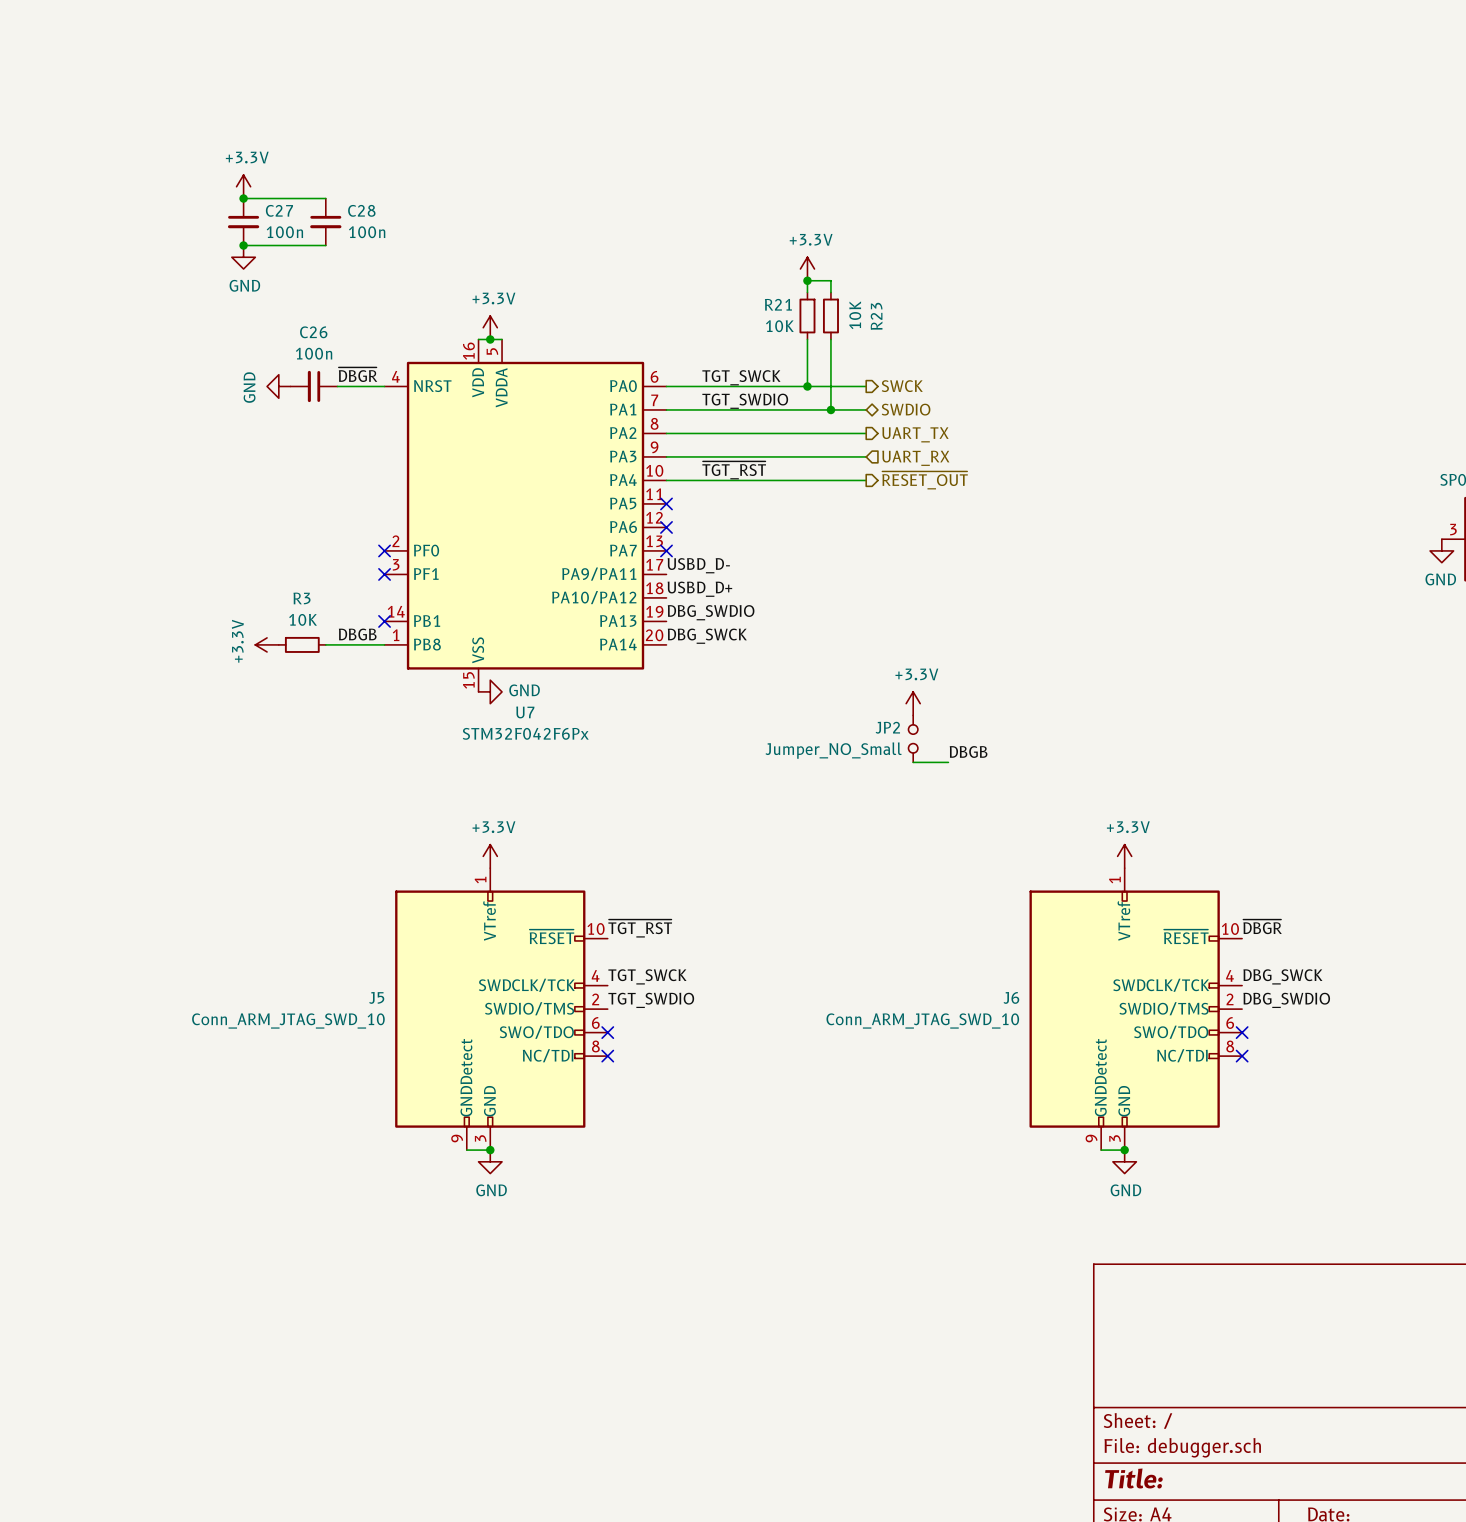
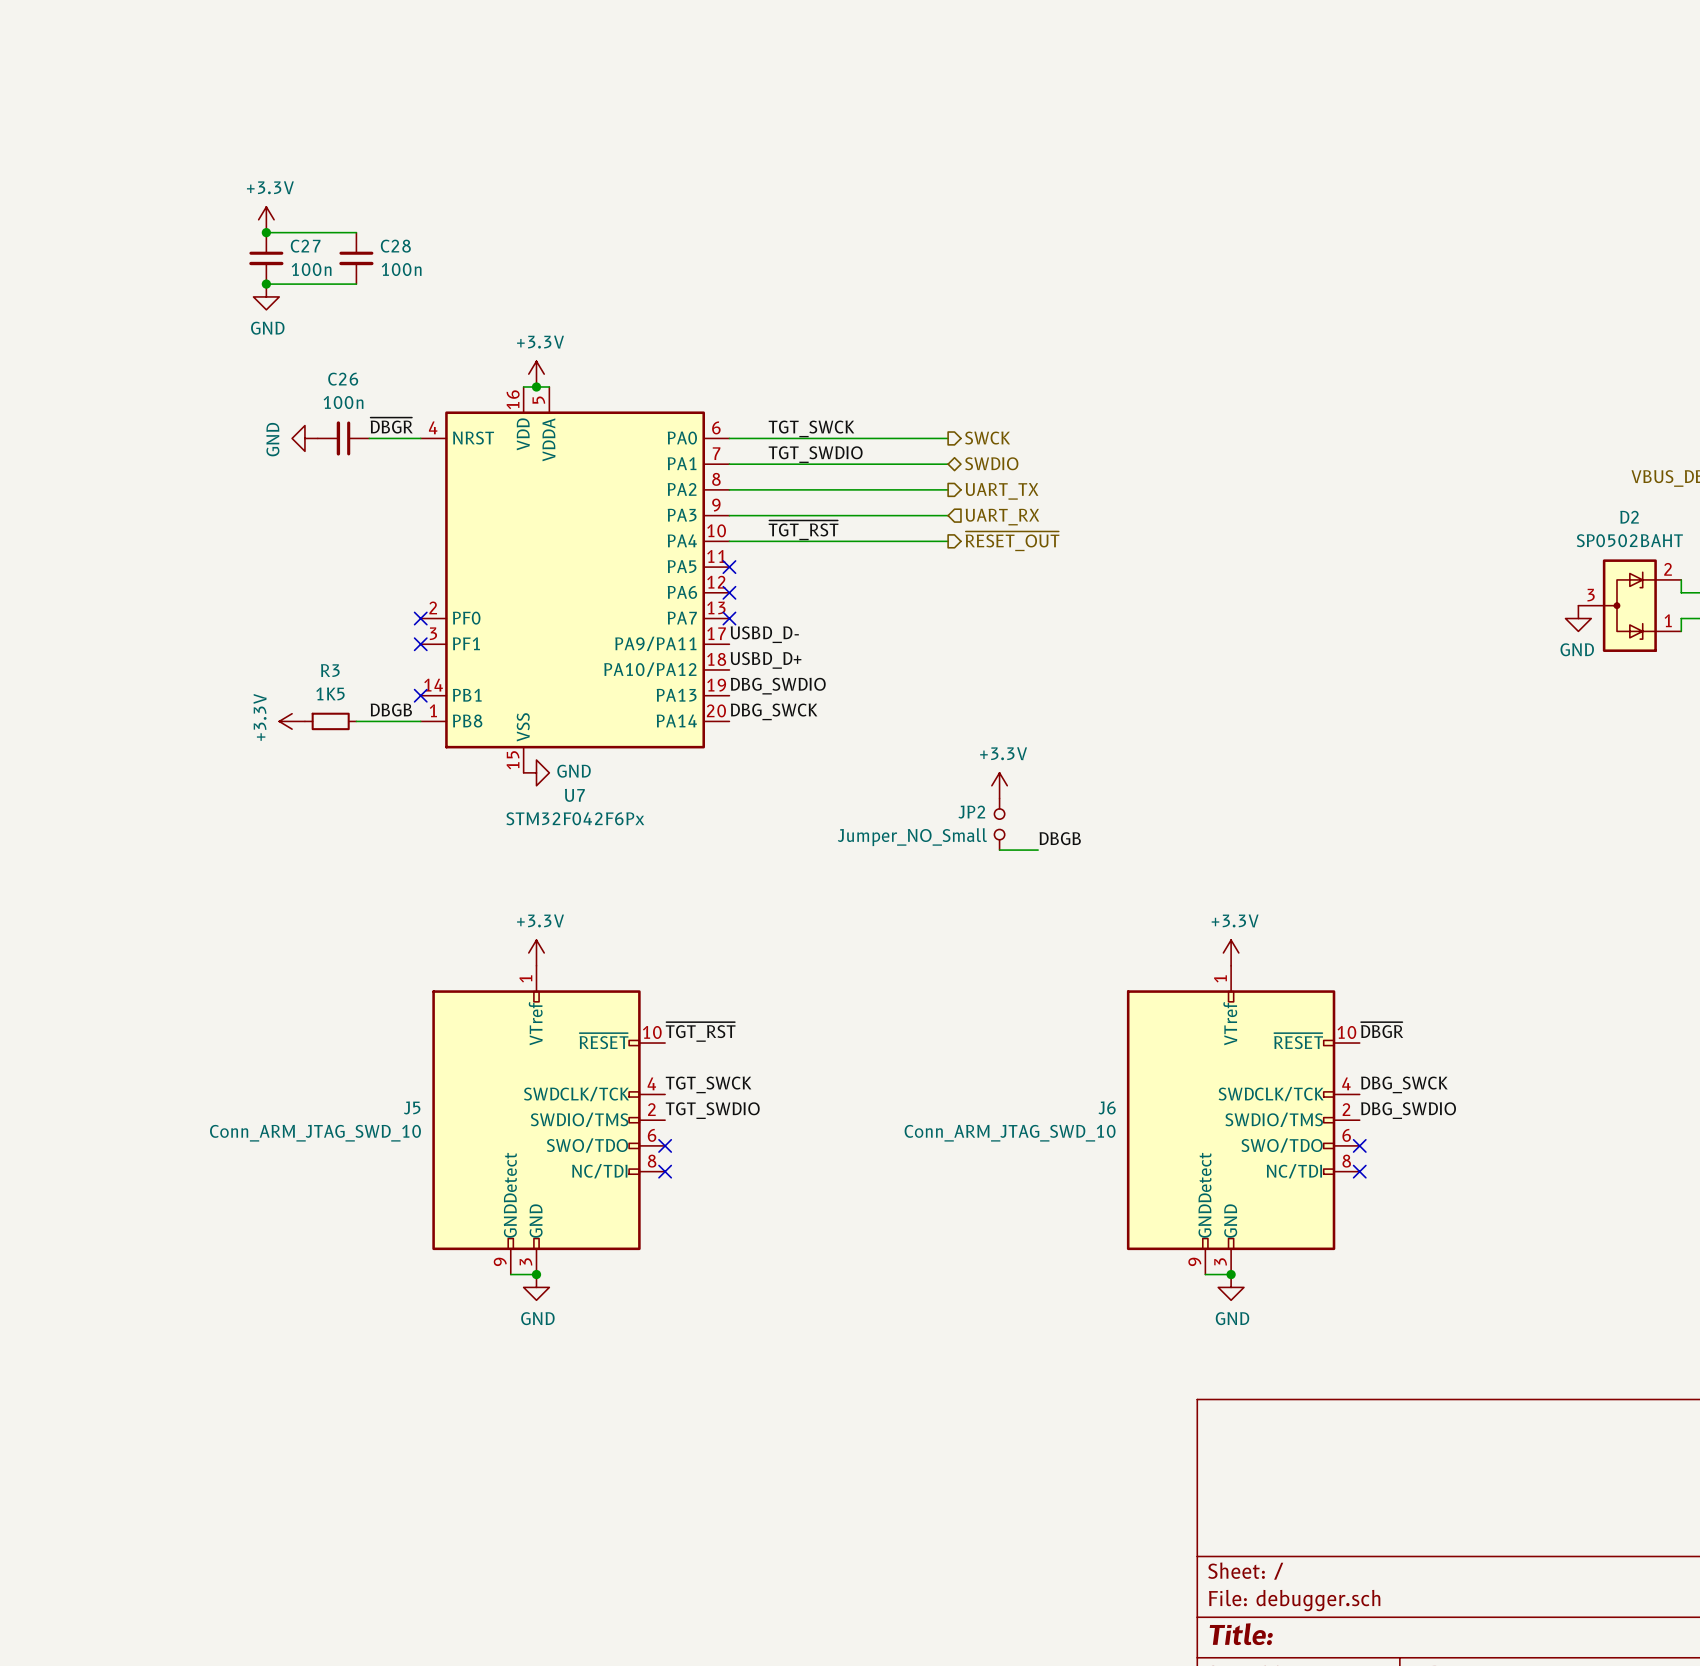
power symbol: +3.3V (807, 269) -> none
junction: (807, 280) -> none
wire: (807, 292) (807, 280) (830, 280) (830, 292) -> none
R21: 10K (807, 316) -> none
R23: 10K (830, 316) -> none
wire: (807, 339) (807, 386) -> none
wire: (830, 339) (830, 409) -> none
junction: (807, 386) -> none
junction: (830, 409) -> none
R3 value: 10K (303, 619) -> 1K5 (330, 693)

